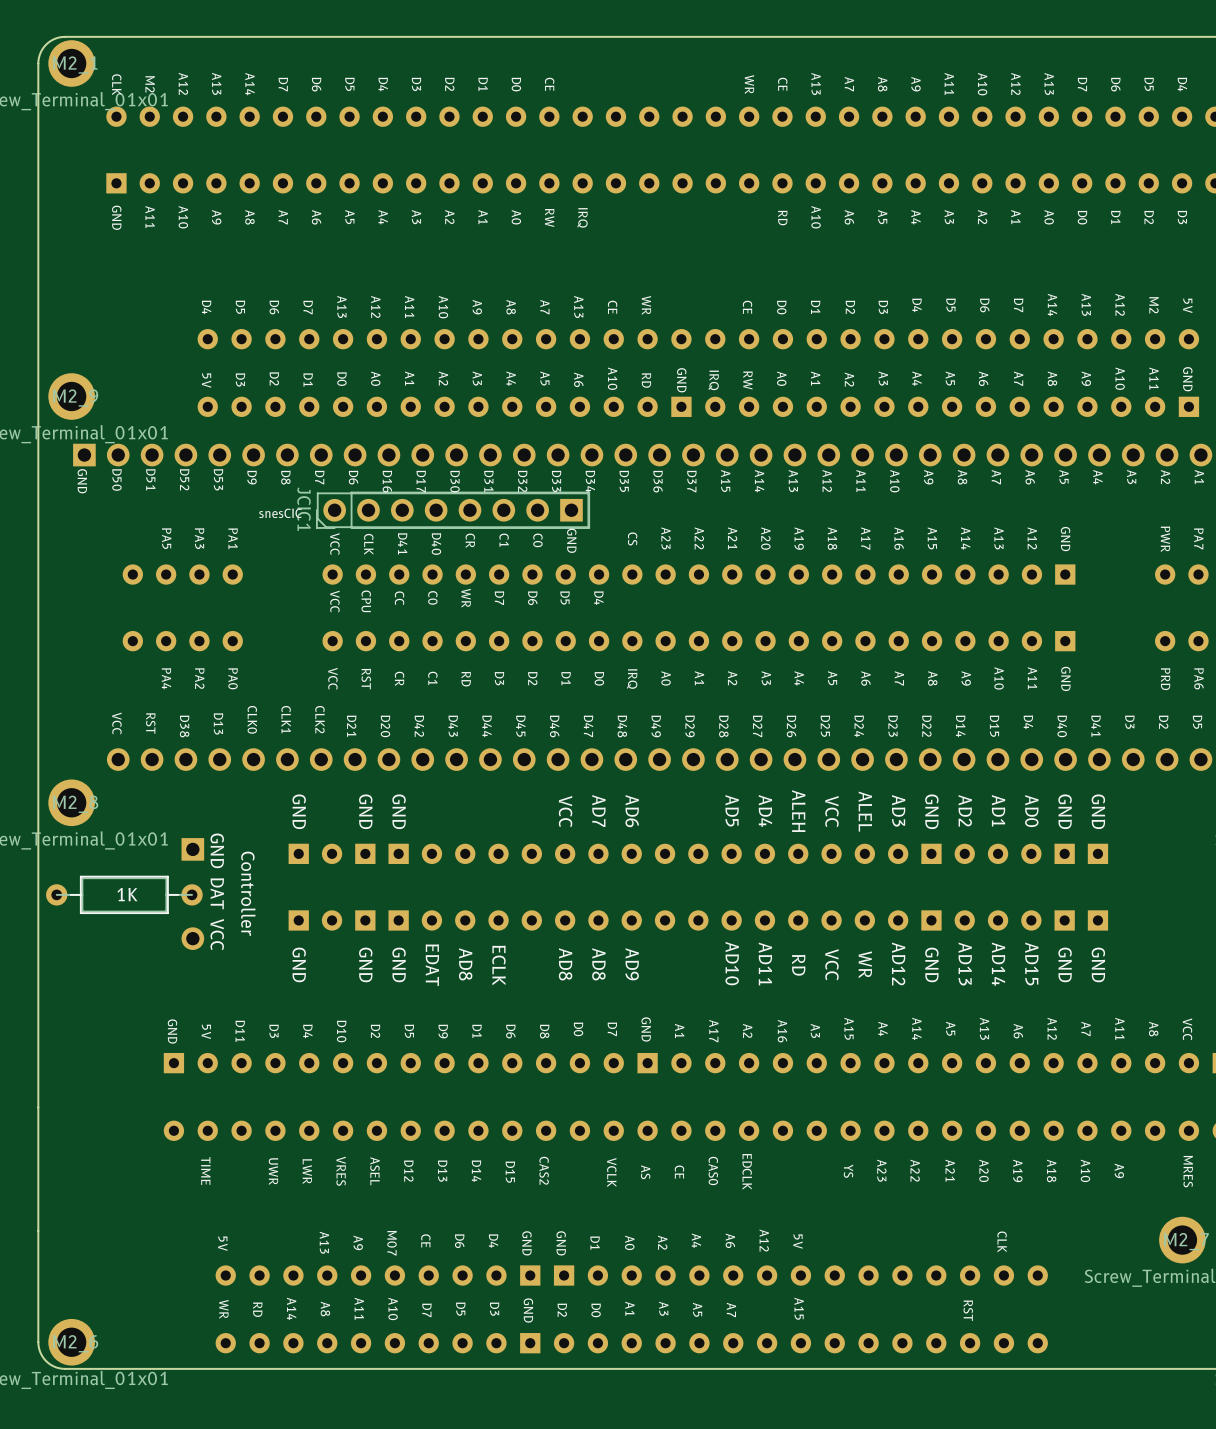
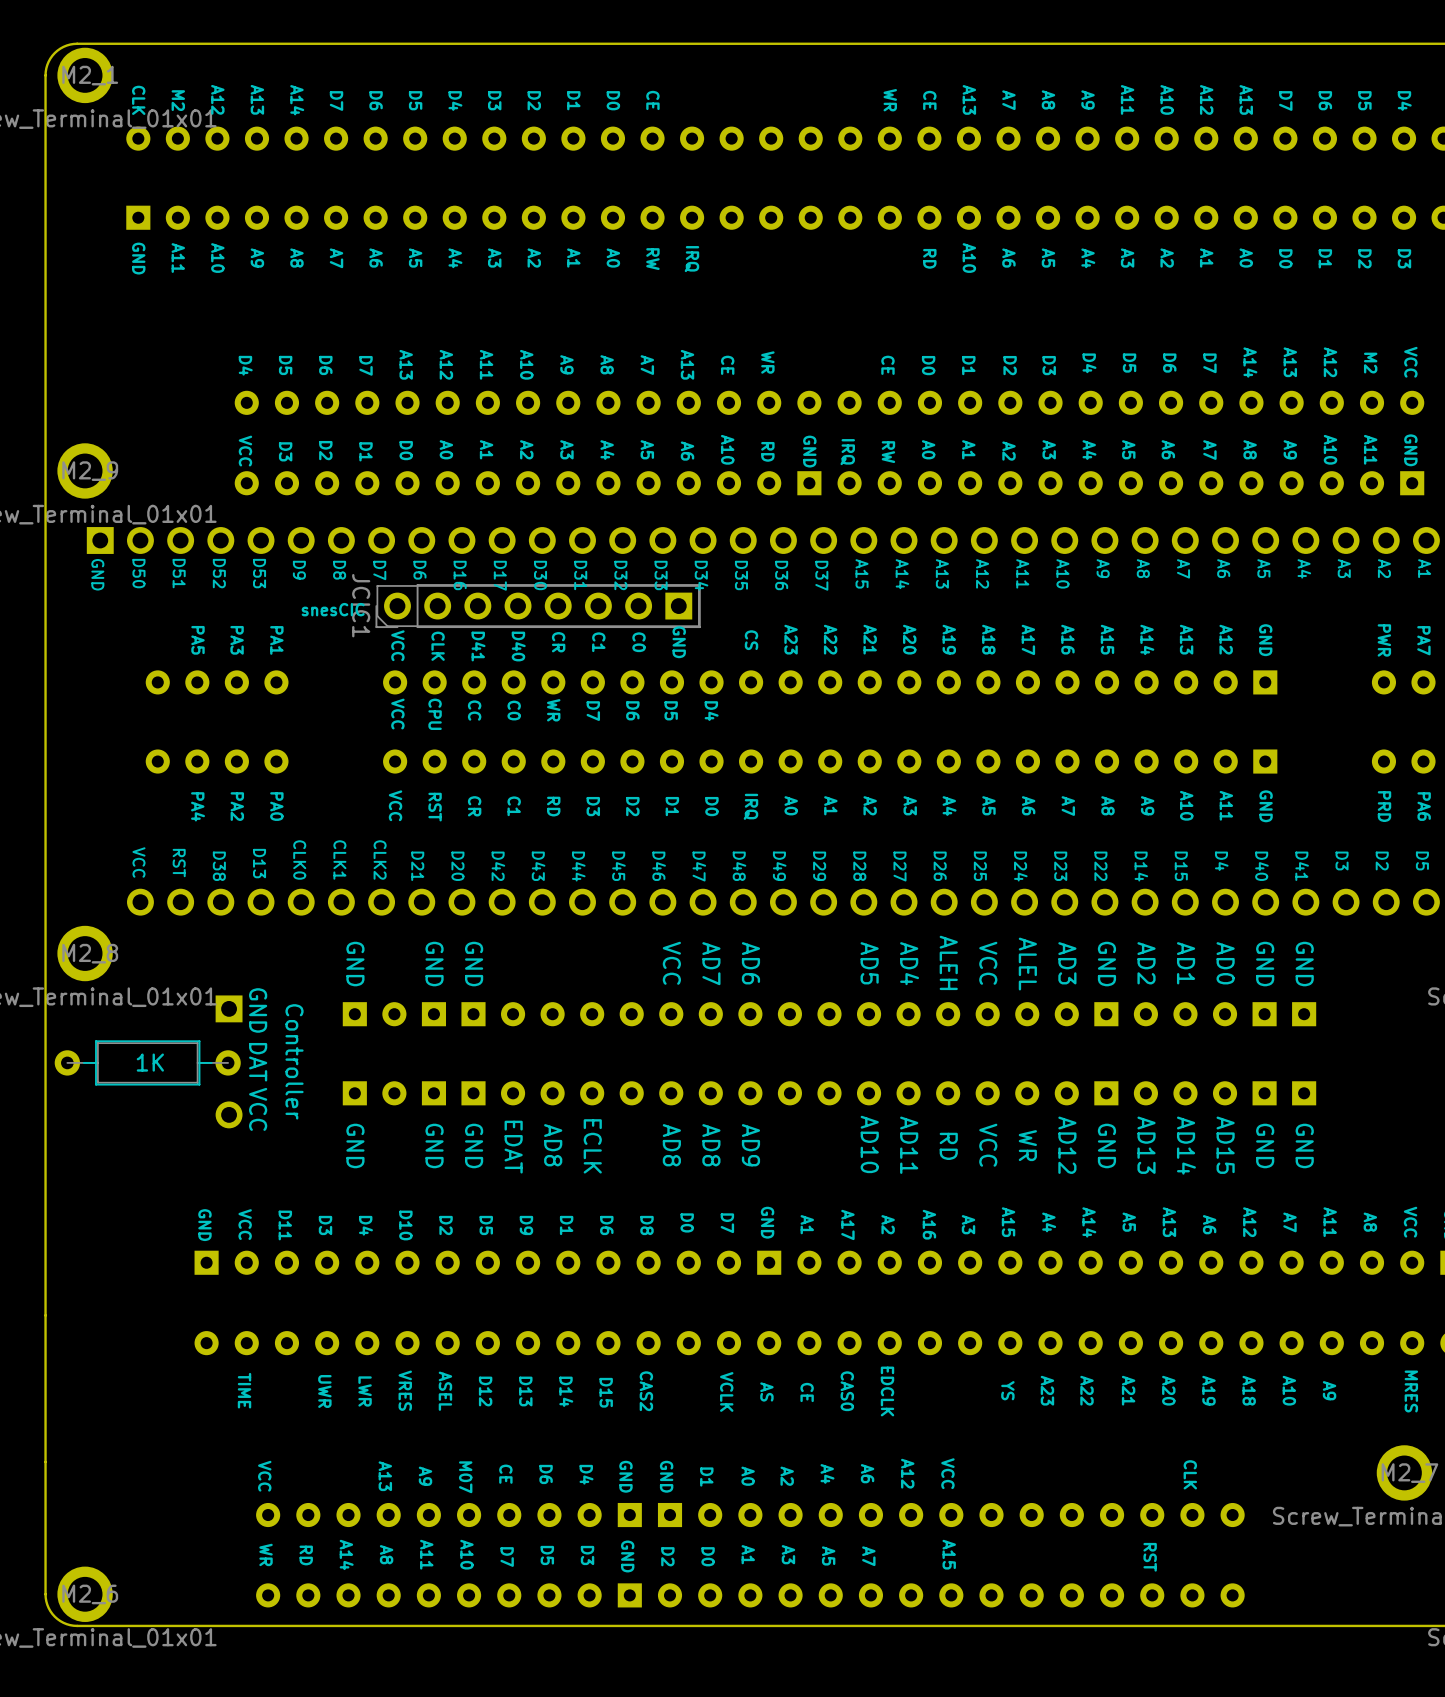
text: 5V (1187, 305) -> VCC (1410, 362)
text: 5V (206, 380) -> VCC (245, 451)
text: 5V (206, 1031) -> VCC (245, 1224)
text: 5V (798, 1241) -> VCC (947, 1473)
text: 5V (222, 1243) -> VCC (264, 1476)

